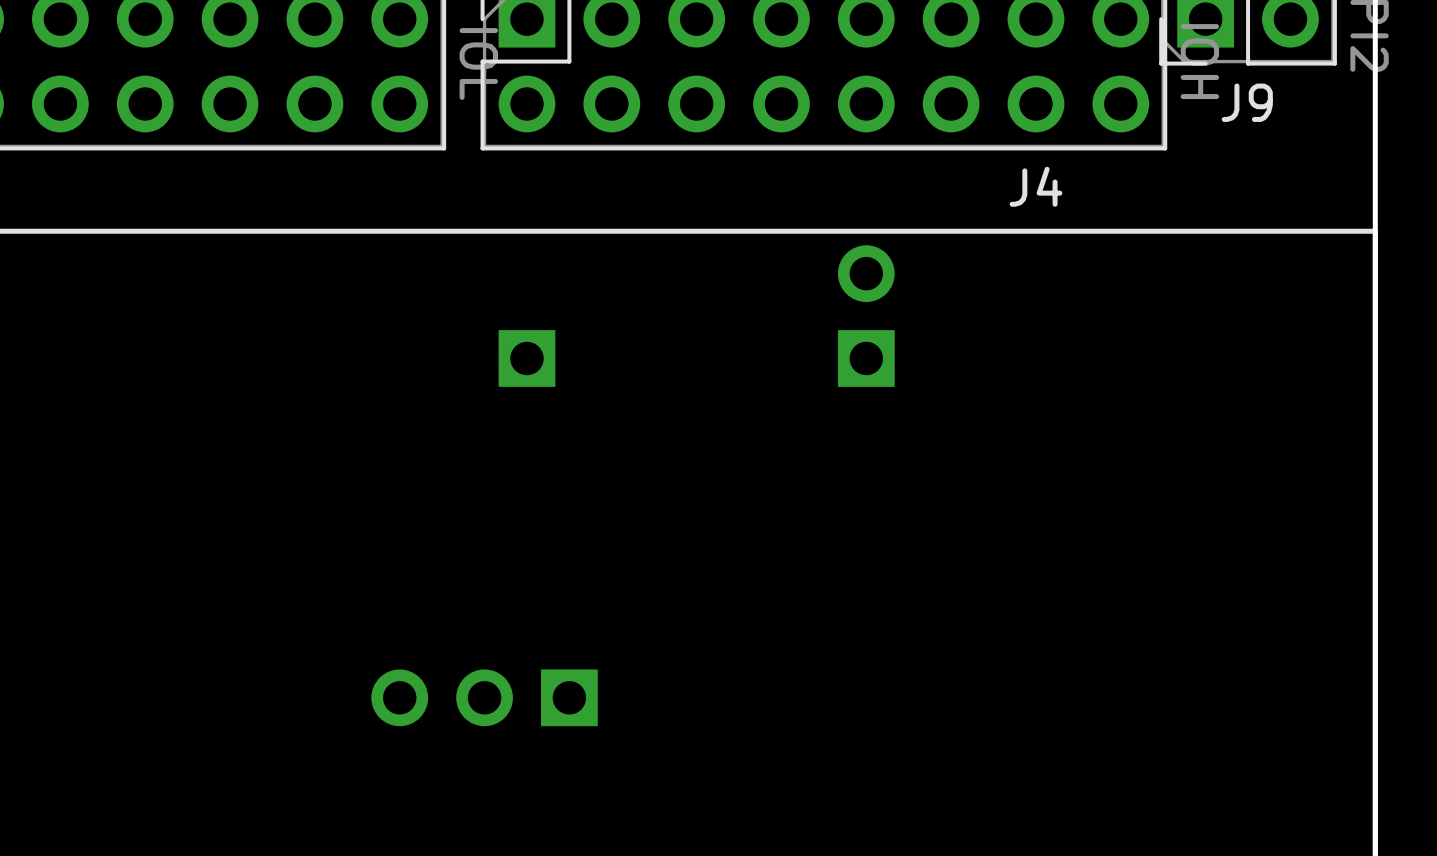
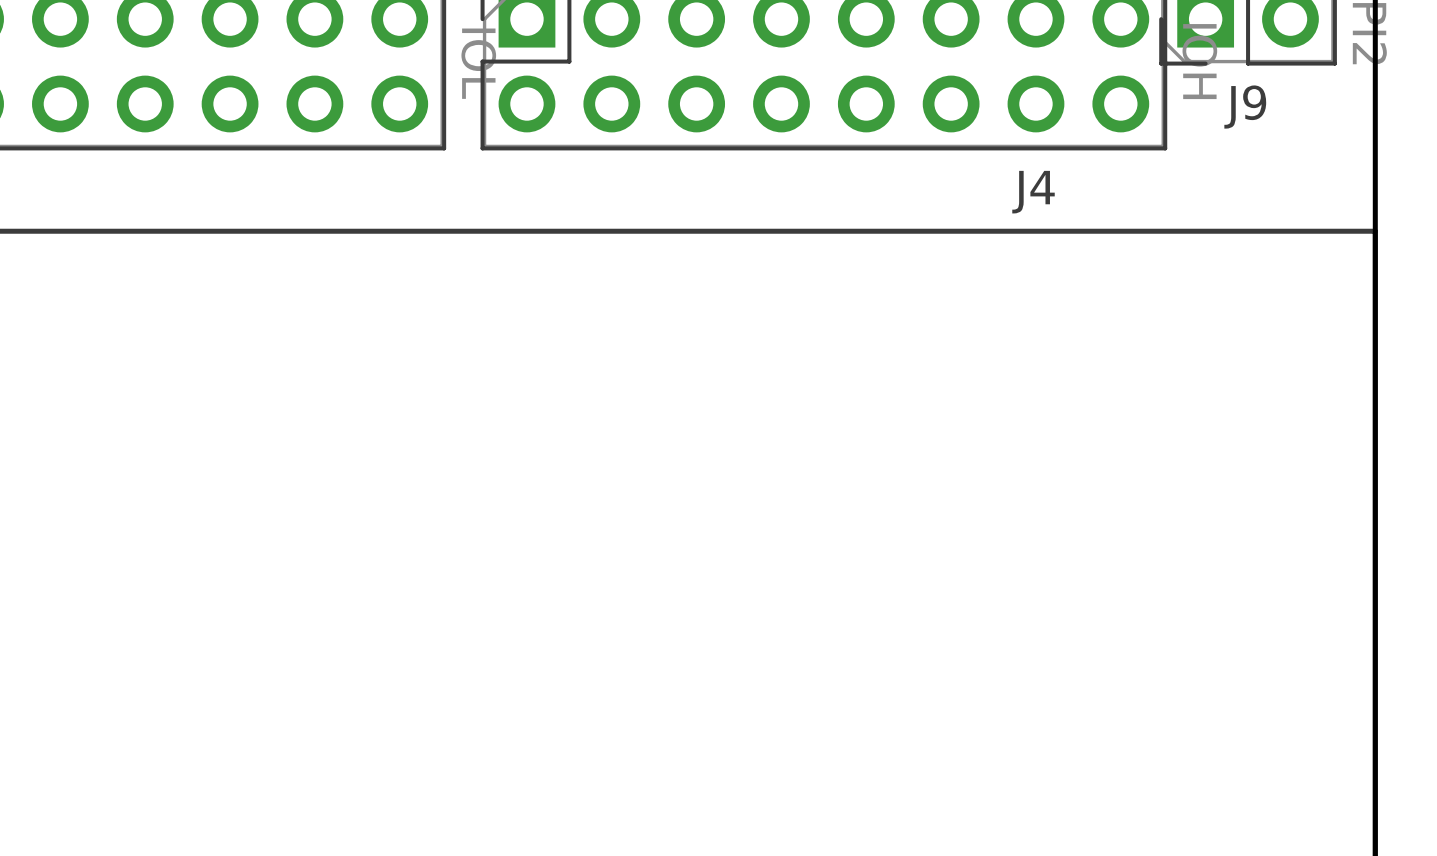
part: (866, 316) -> none
part: (526, 358) -> none
part: (484, 697) -> none

